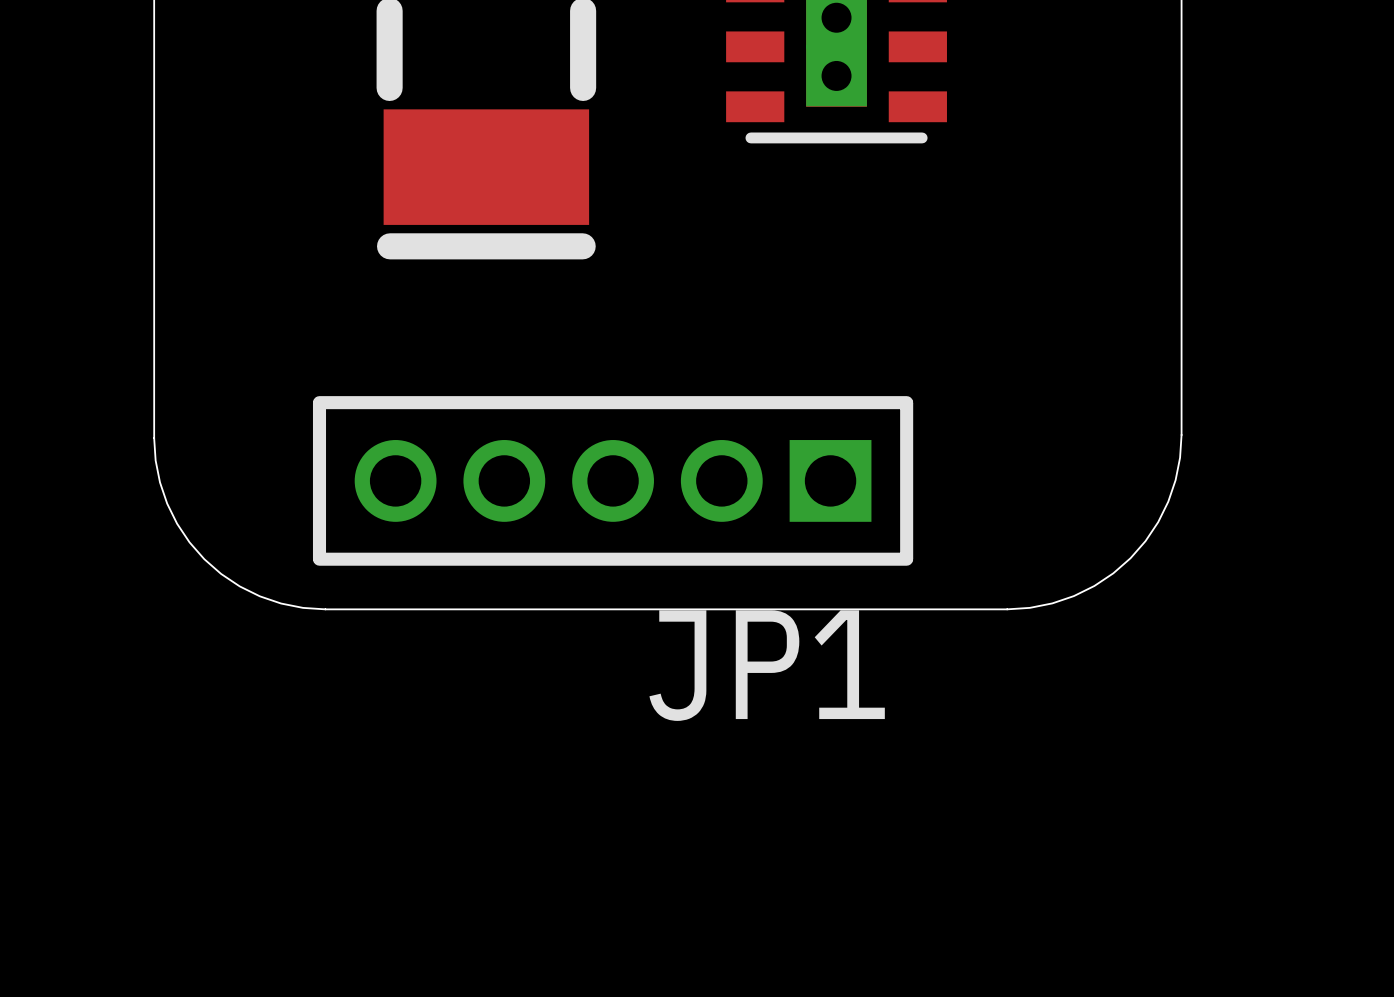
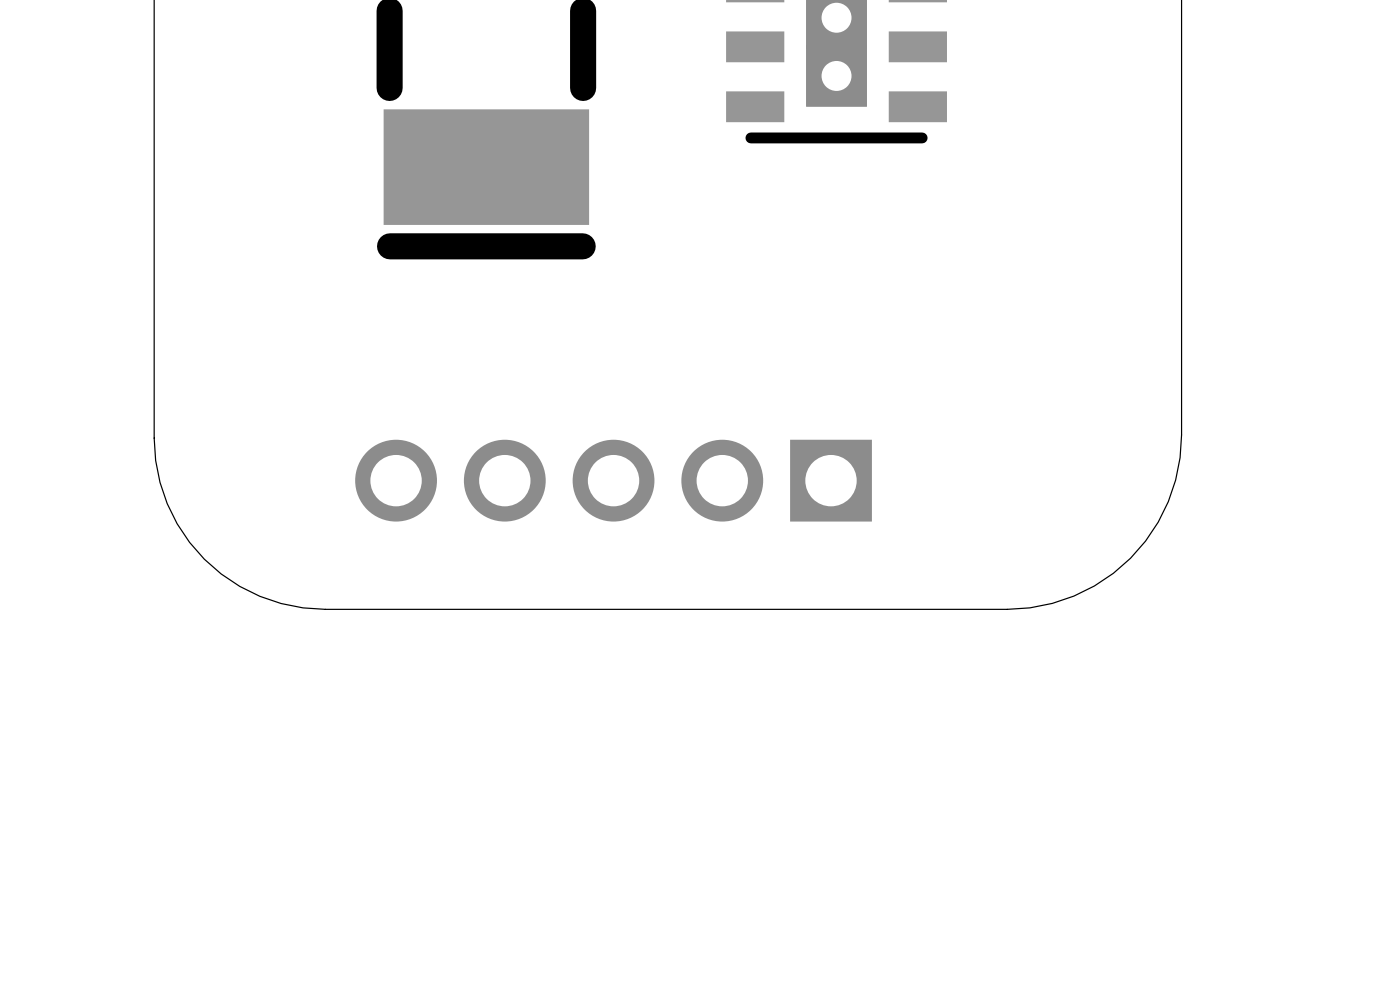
JP1 side: top (613, 480) -> bottom (613, 480)

